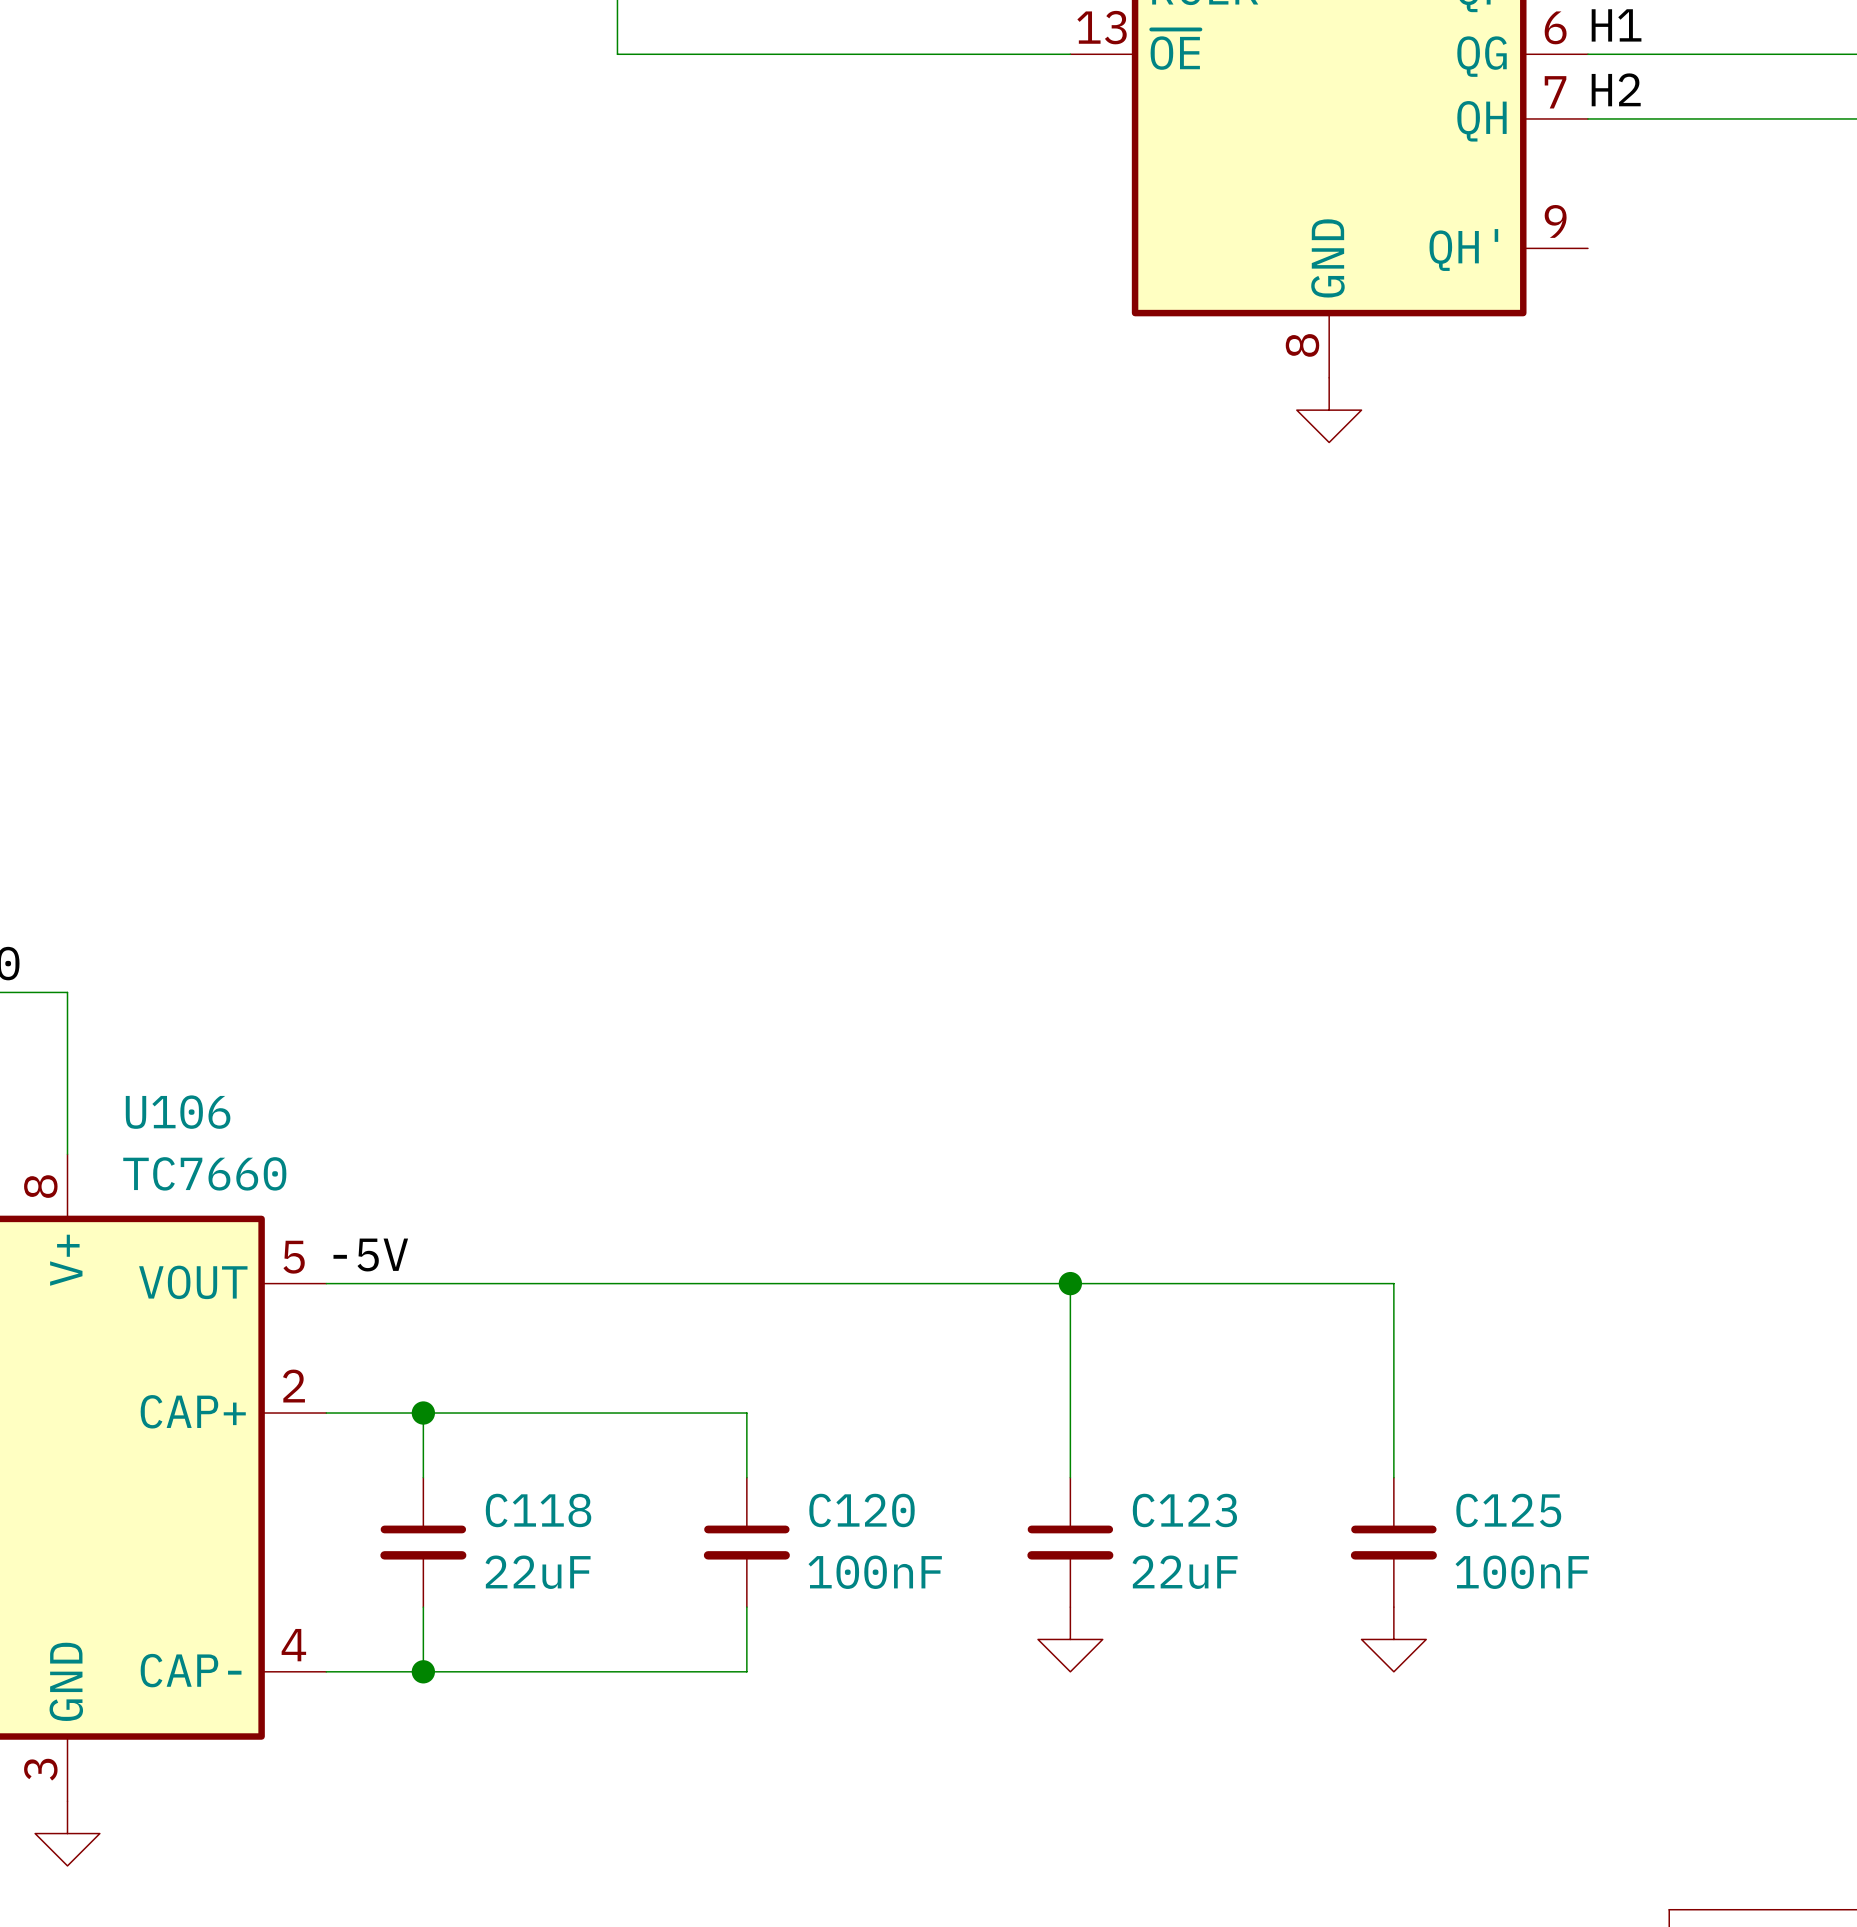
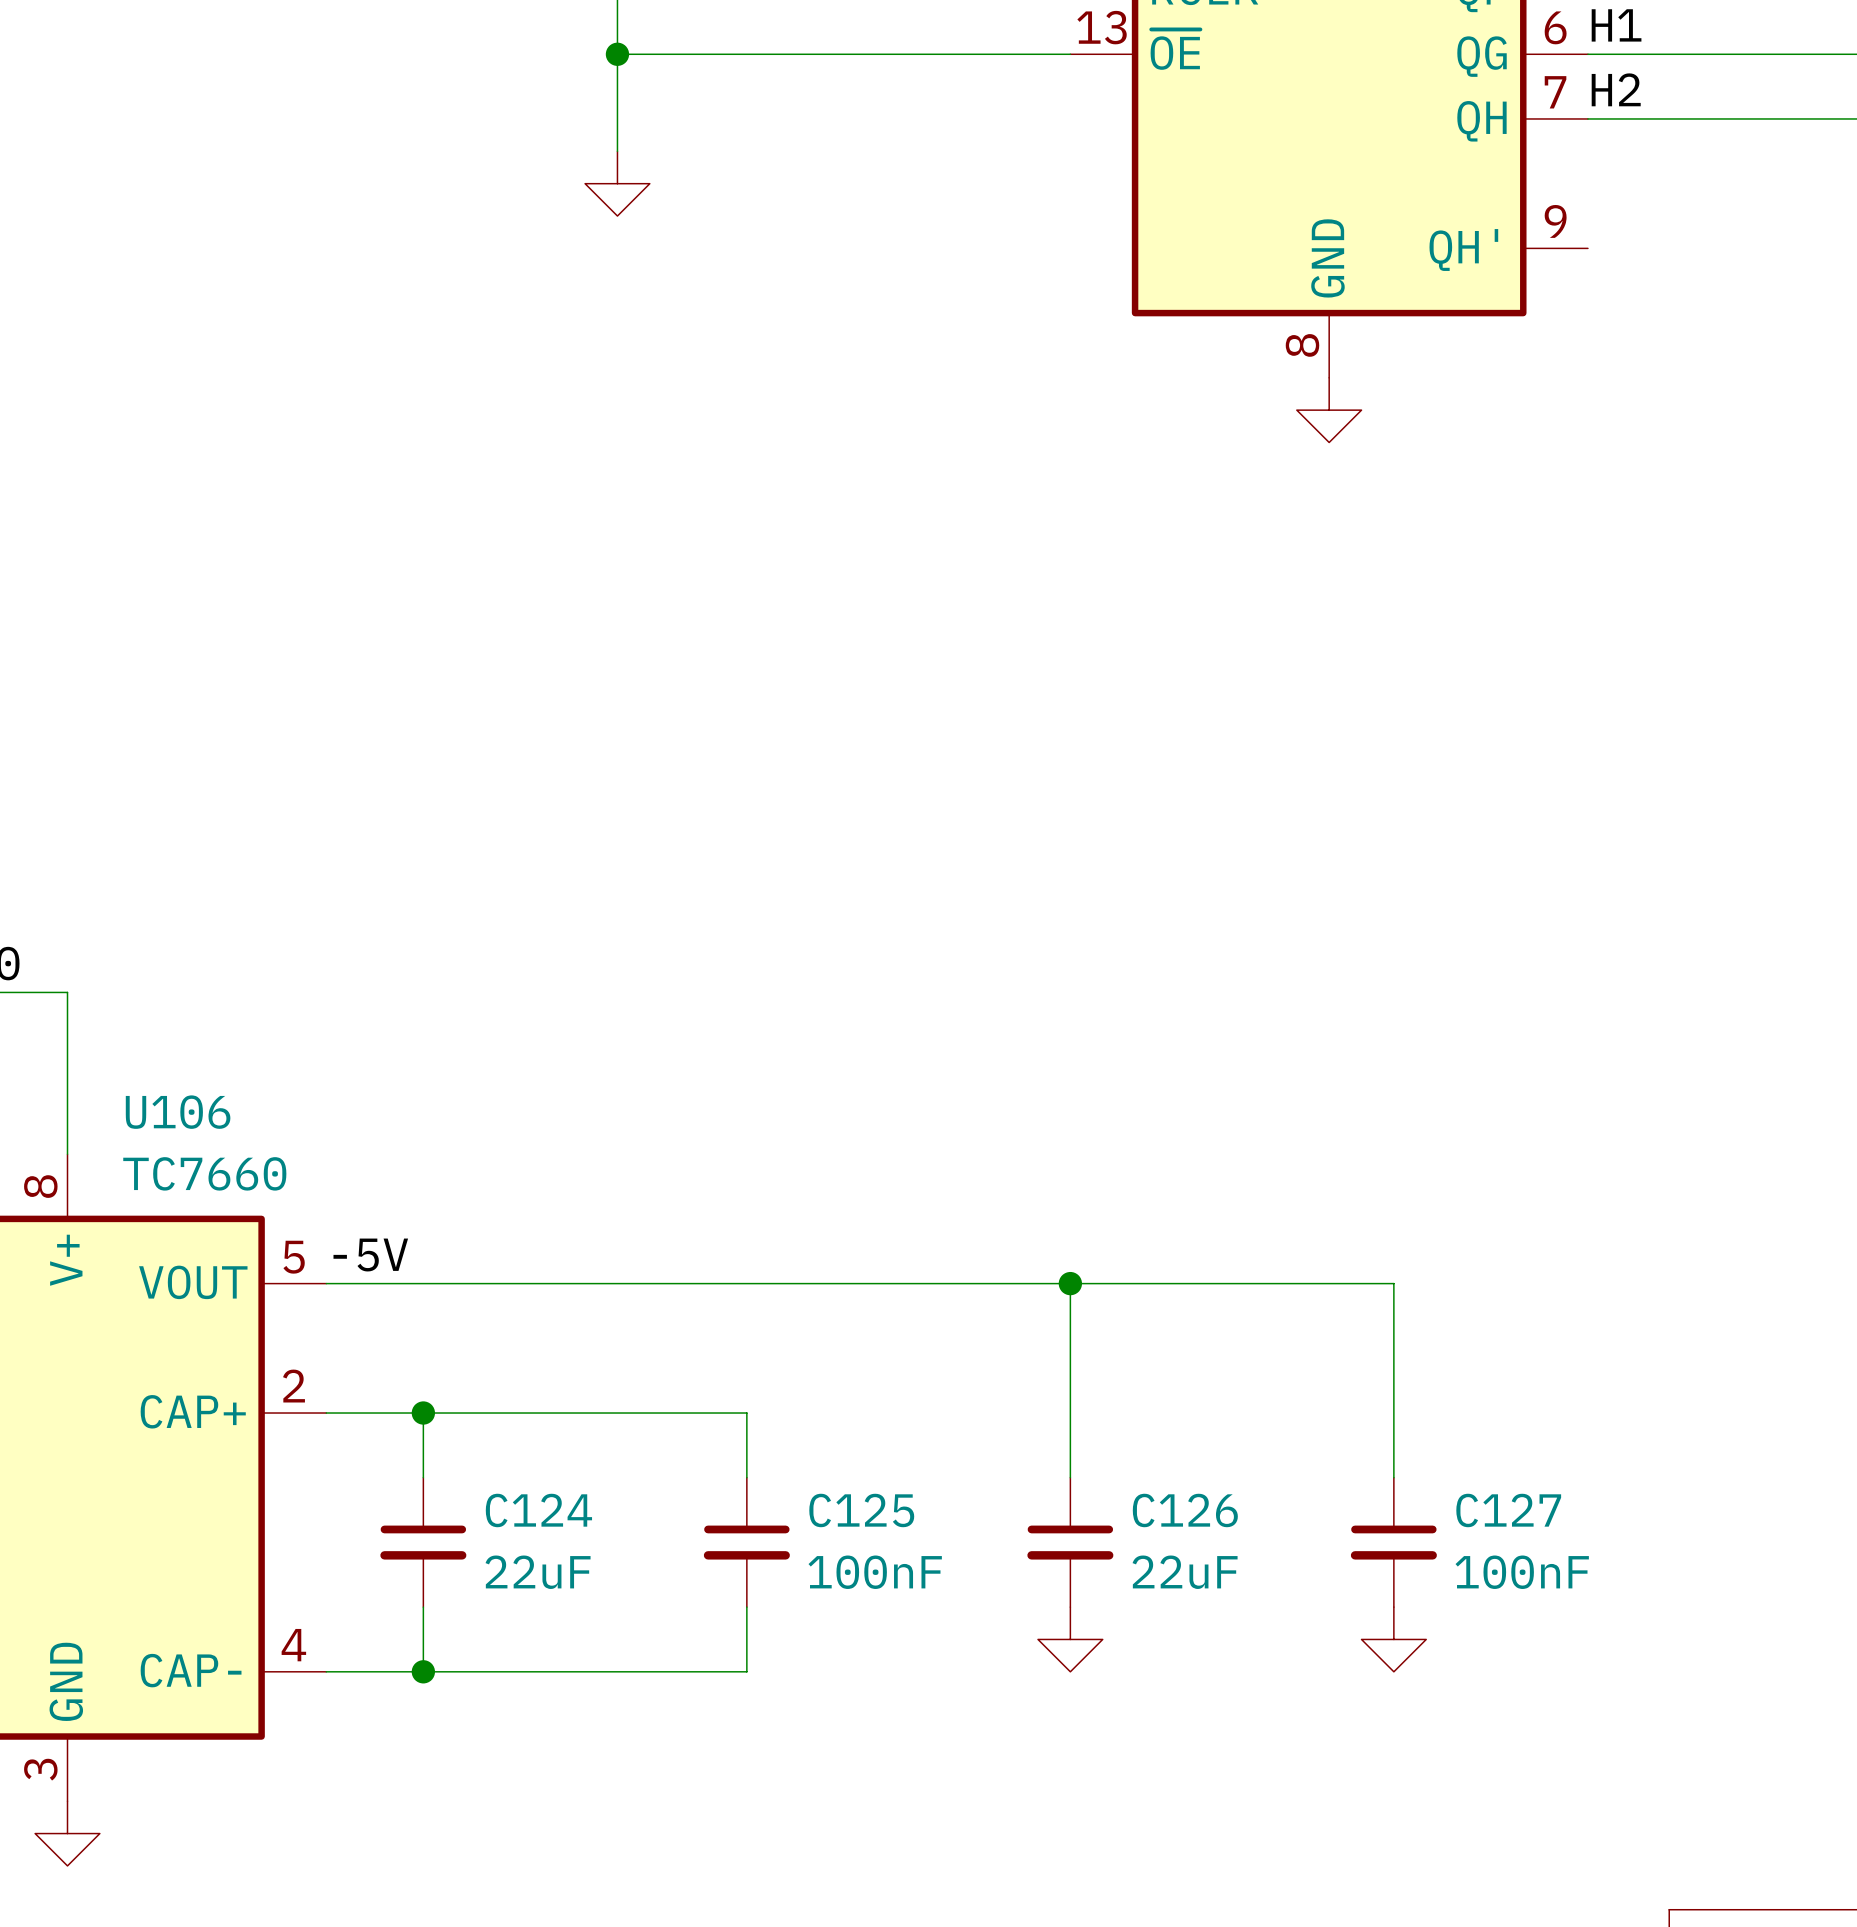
wire: none -> (617, 54) (617, 151)
junction: none -> (617, 54)
power symbol: none -> (617, 183)
C118 name: C118 (538, 1510) -> C124 (538, 1510)
C120 name: C120 (862, 1510) -> C125 (861, 1510)
C123 name: C123 (1184, 1510) -> C126 (1185, 1510)
C125 name: C125 (1508, 1510) -> C127 (1508, 1510)

